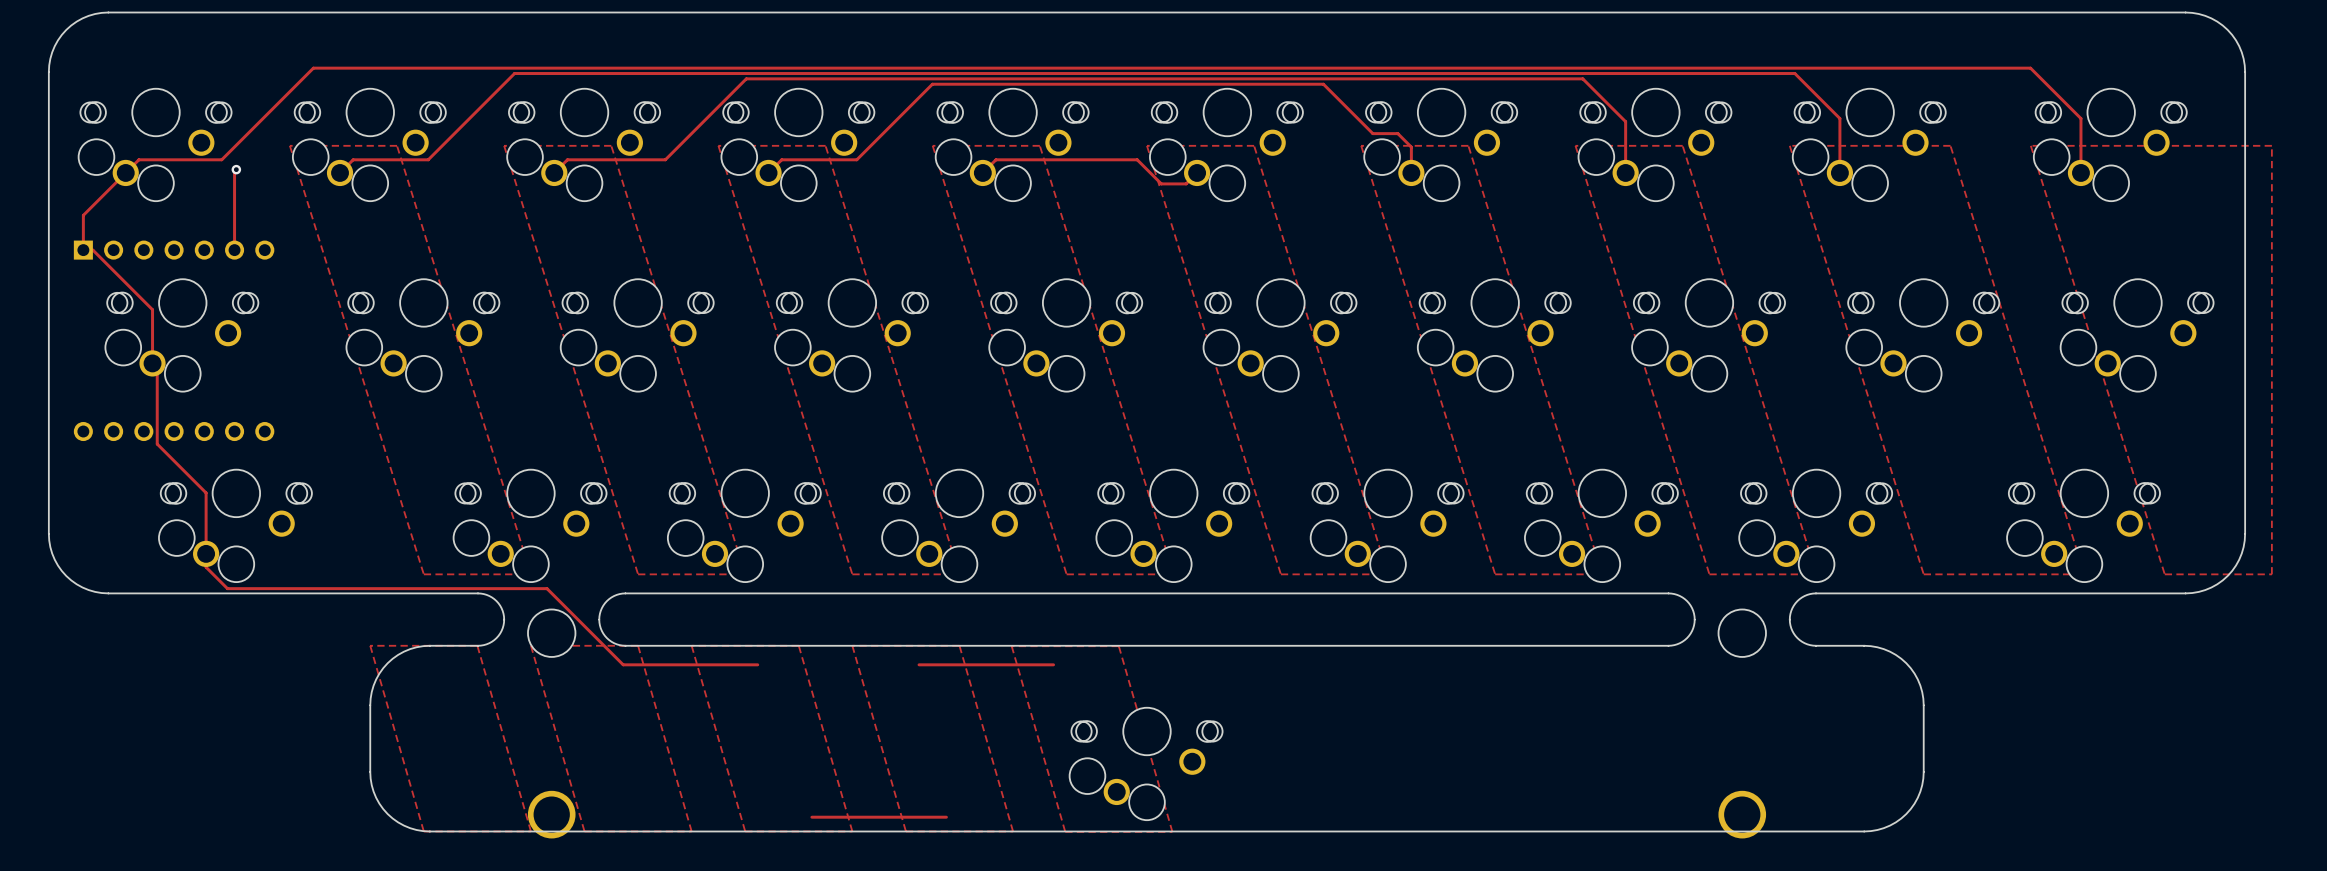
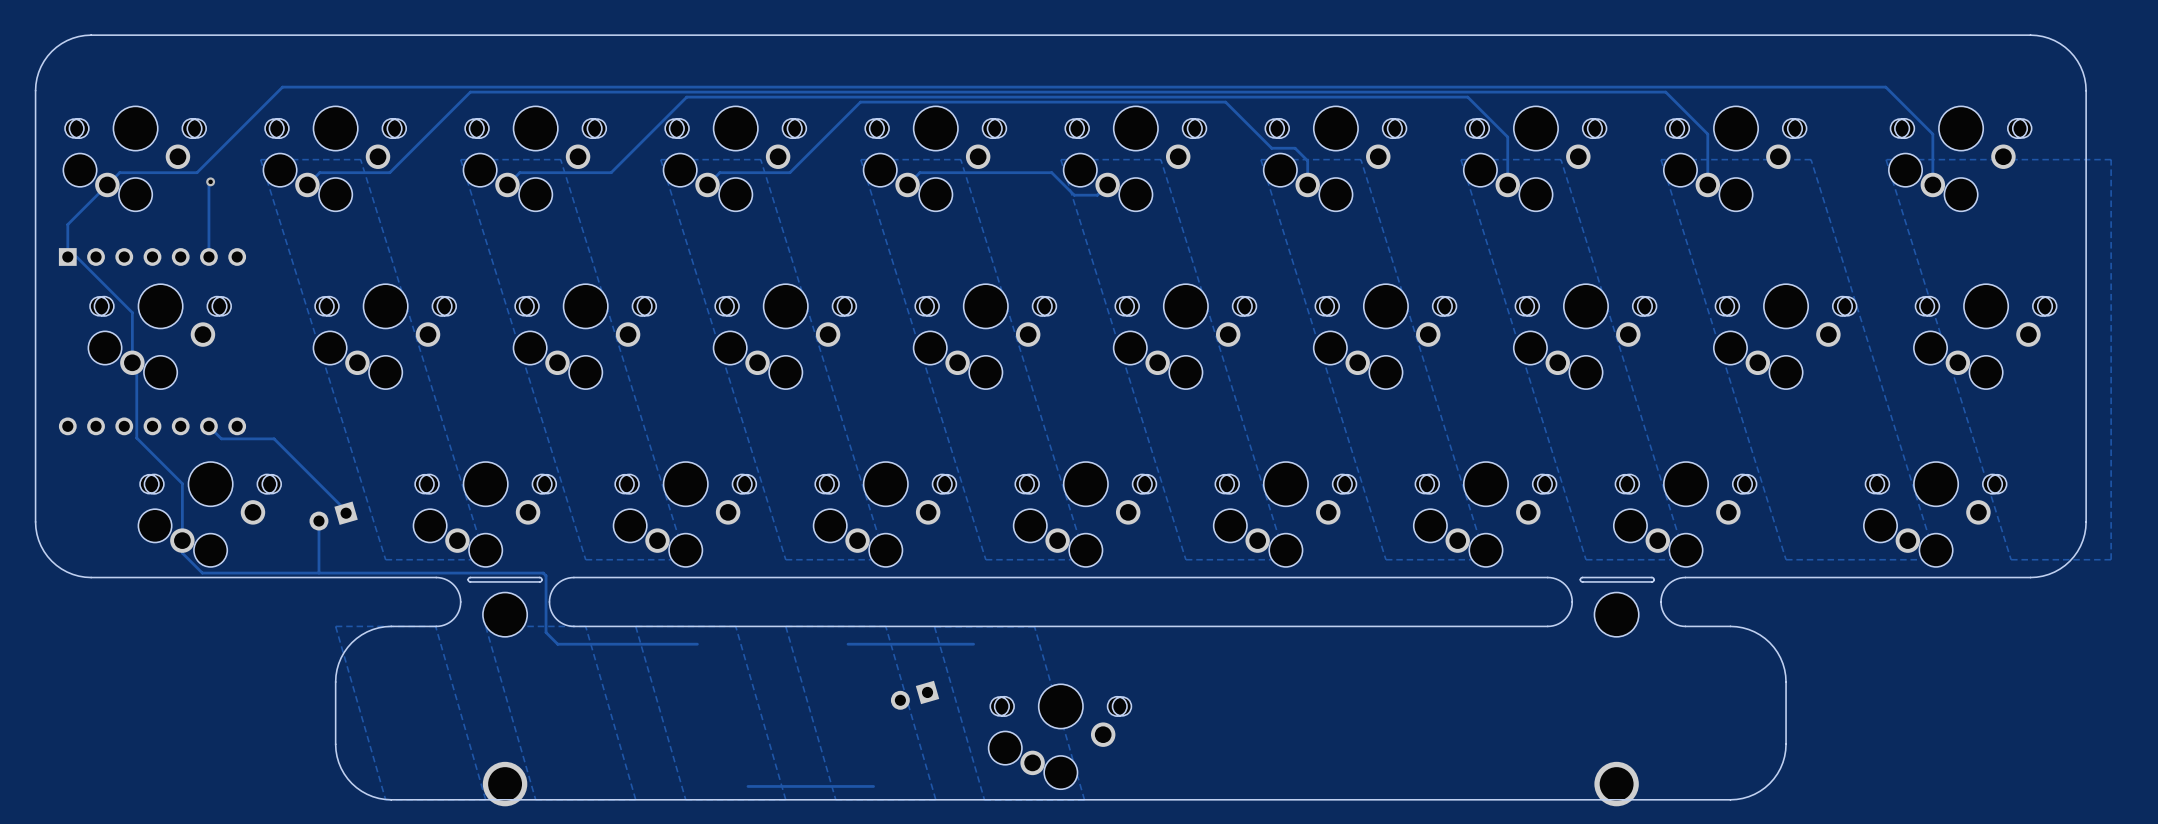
track: none -> (208, 426) (221, 438) (274, 438) (346, 510) (346, 513)
part: none -> (333, 516)
track: none -> (318, 521) (318, 573)
track: (547, 588) (623, 664) -> (500, 573) (543, 573) (546, 575) (546, 632) (557, 644) (571, 644)
board edge: none -> (470, 577) (539, 577) (541, 579) (539, 581) (470, 581) (468, 579) (470, 577)
board edge: none -> (1582, 577) (1651, 577) (1654, 579) (1651, 581) (1582, 581) (1580, 579) (1582, 577)
part: none -> (915, 695)

